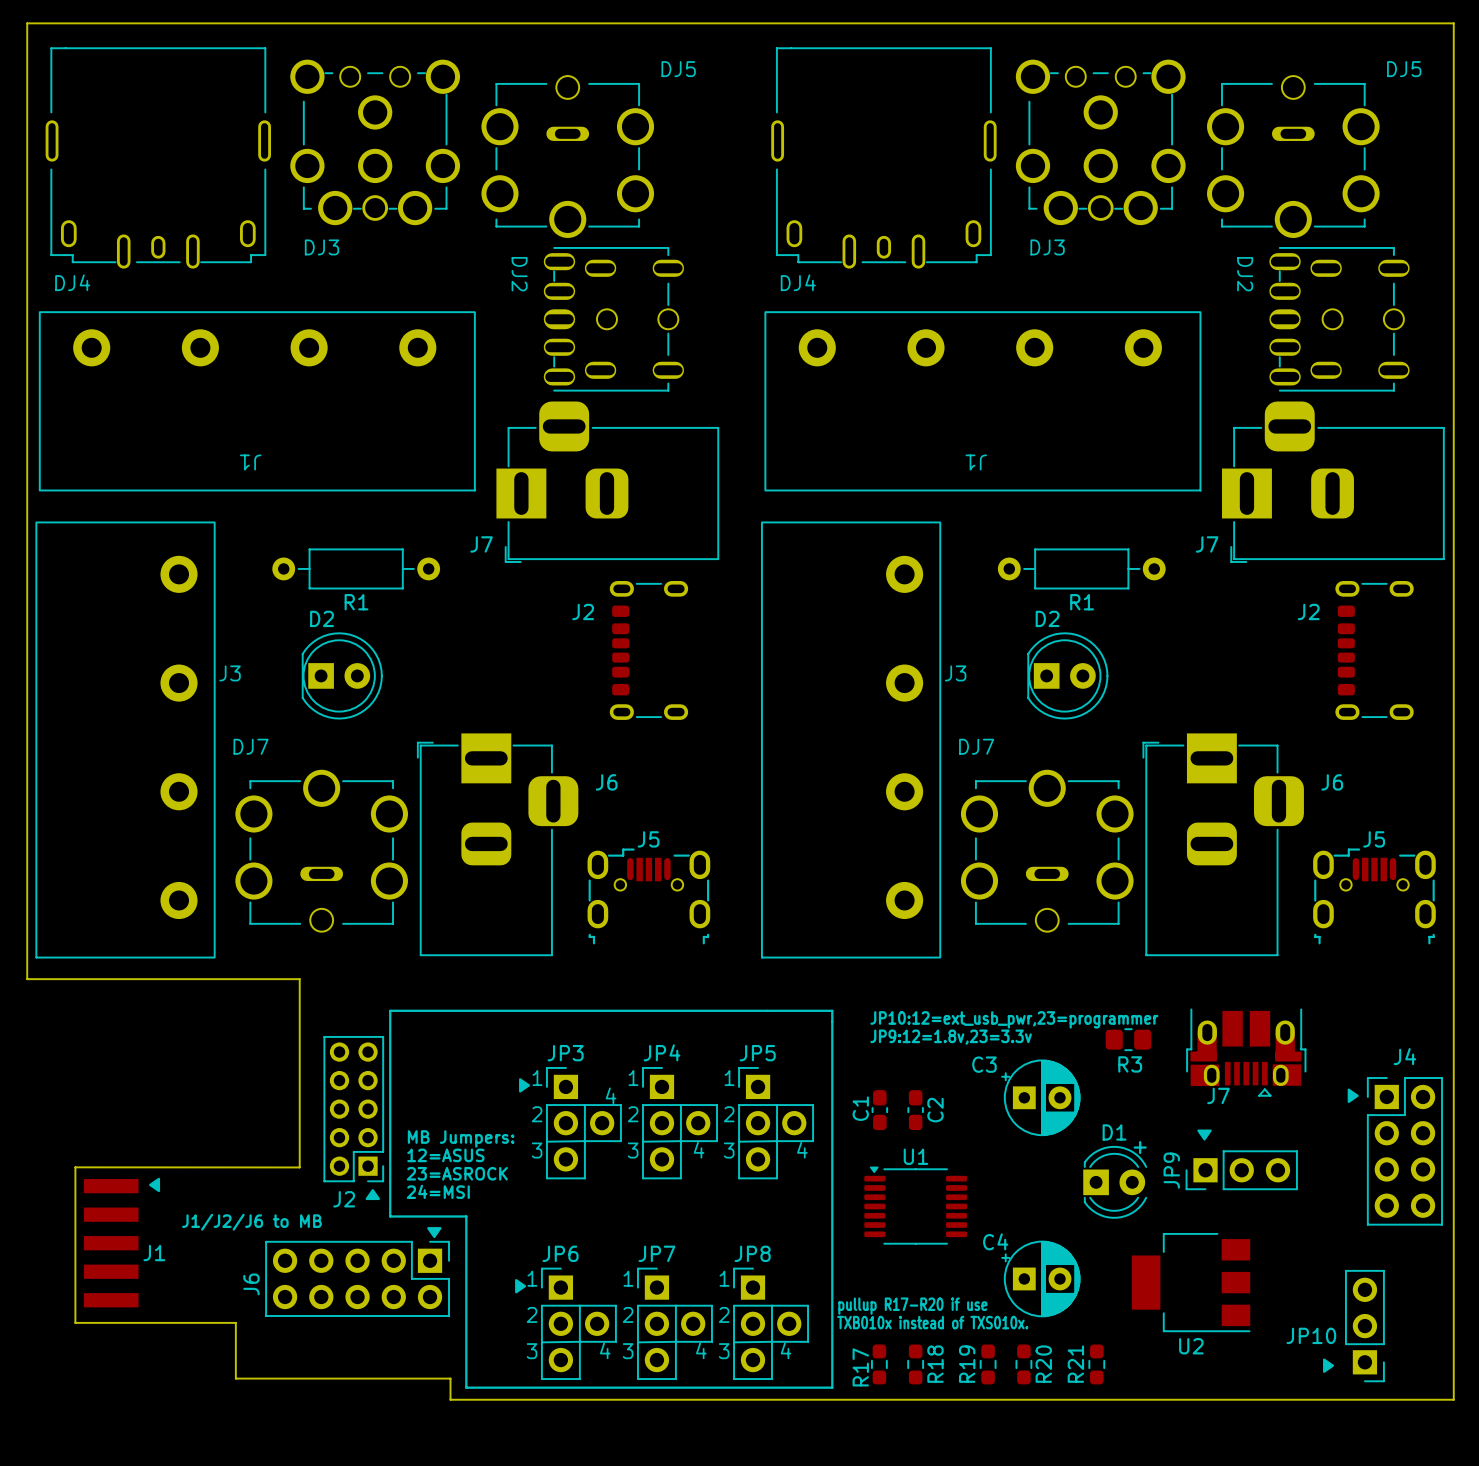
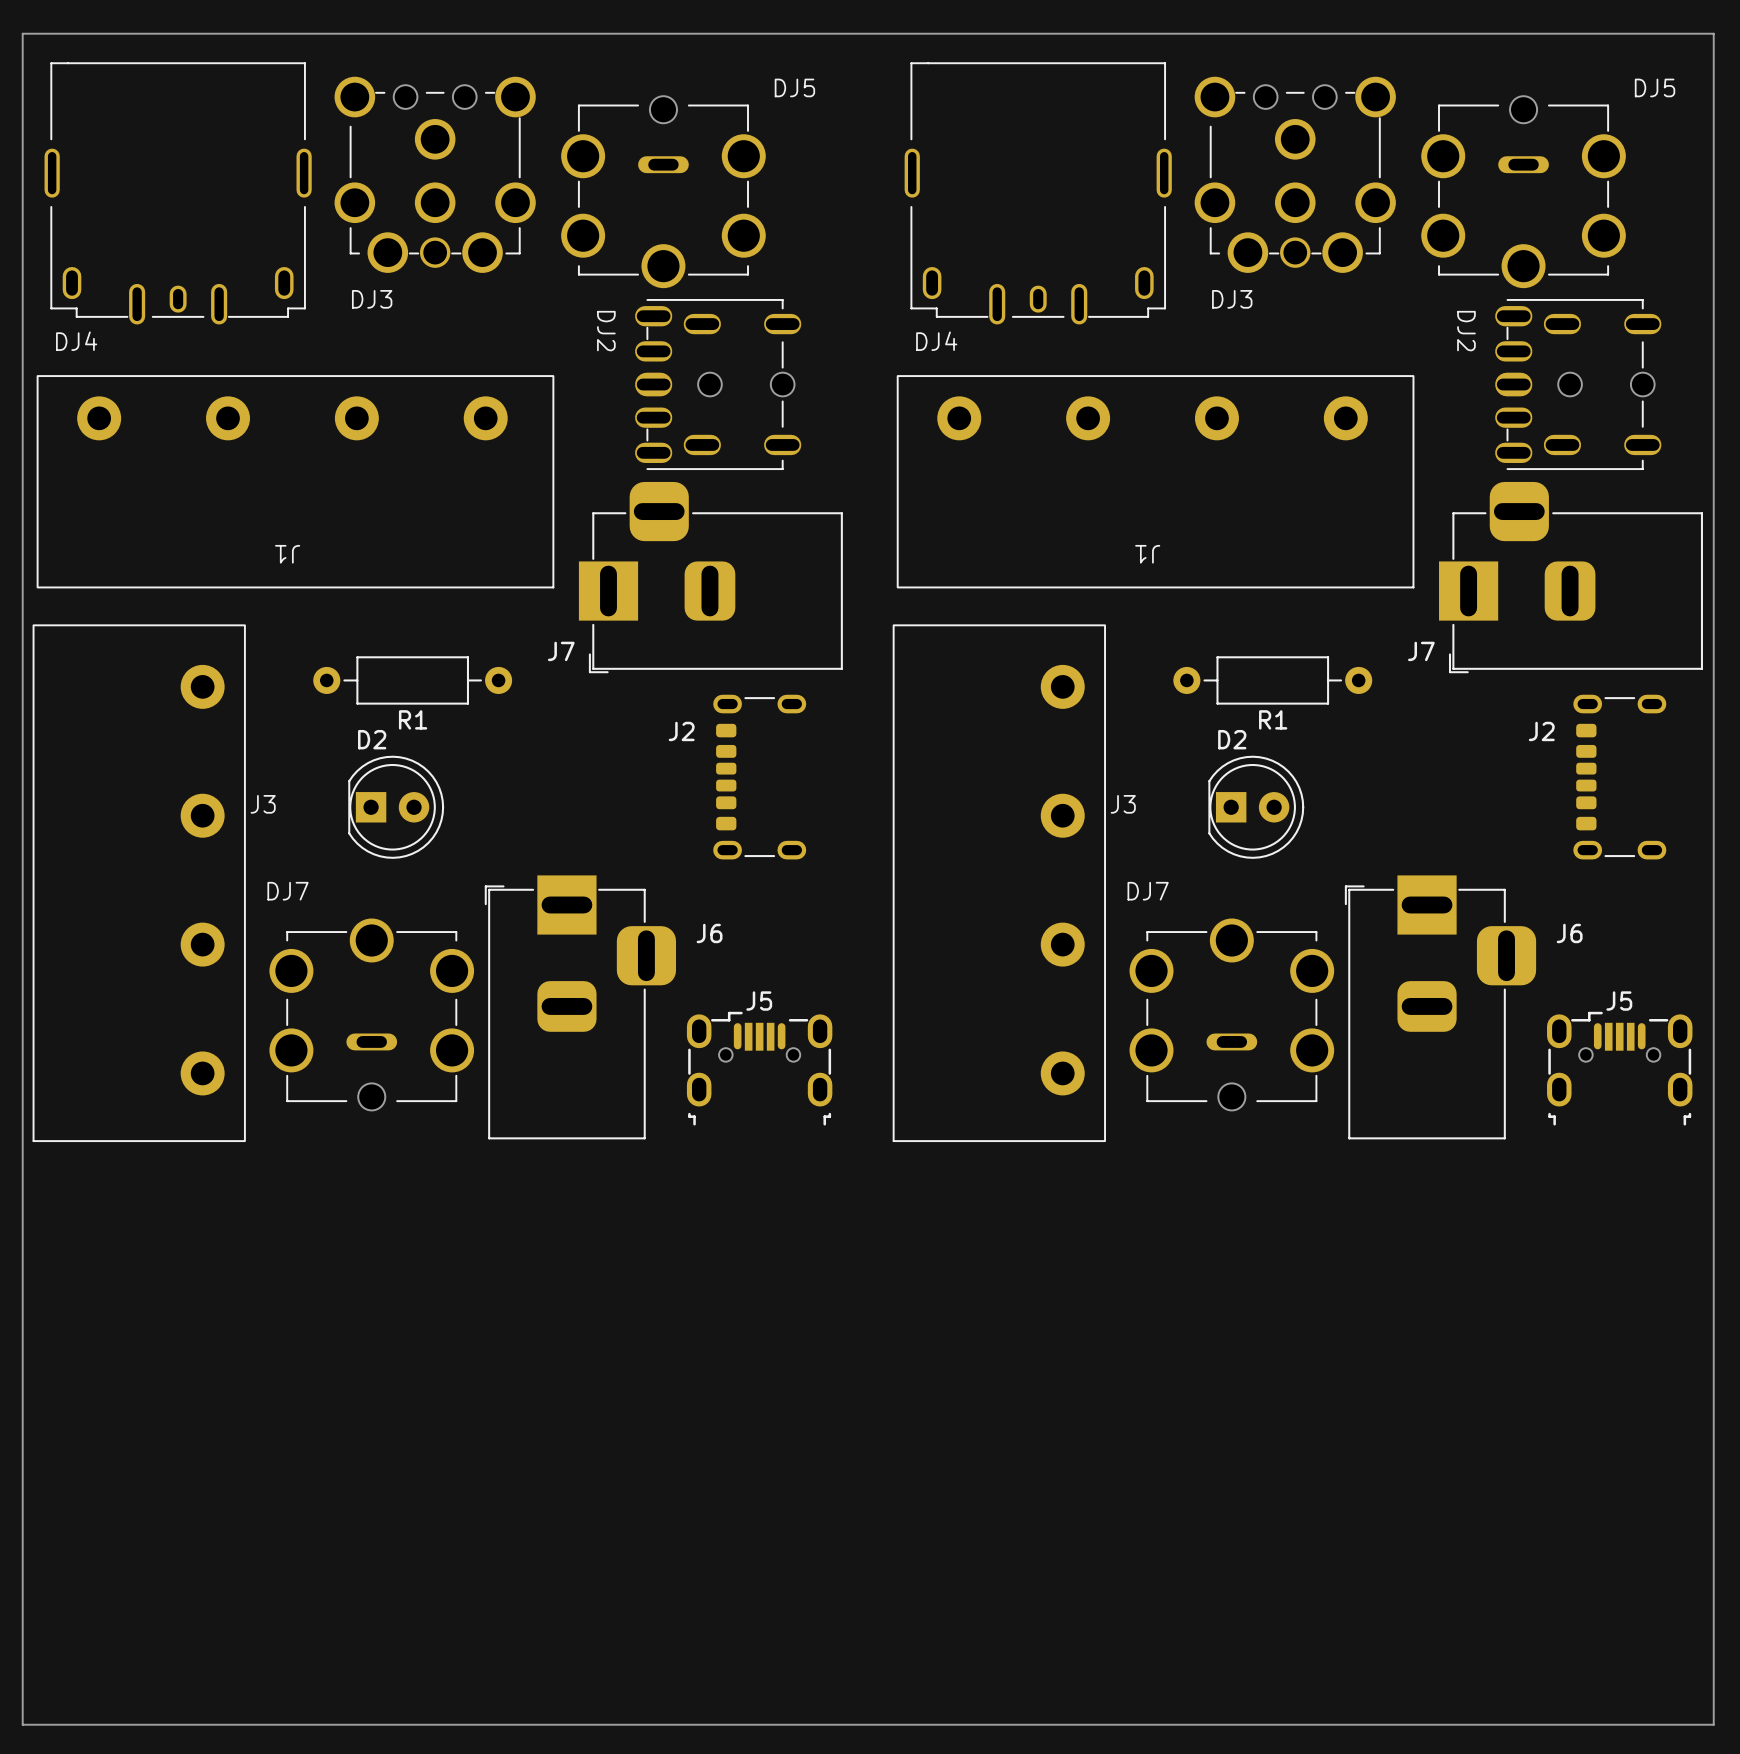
board edge: (27, 979) (299, 979) (299, 1167) (75, 1167) (75, 1322) (235, 1322) (235, 1378) (450, 1378) (450, 1399) (1453, 1399) -> (22, 1166) (22, 1724) (1713, 1724) (1713, 1665)
line: (390, 1010) (832, 1010) (832, 1387) (466, 1387) (466, 1216) (390, 1216) (390, 1010) -> none
text: JP10:12=ext_usb_pwr,23=programmer (1014, 1019) -> none
text: JP9:12=1.8v,23=3.3v (951, 1037) -> none
R3: (1128, 1039) -> none
J7: (1246, 1052) -> none
drawing: [519, 1078, 531, 1093] -> none
drawing: [1347, 1088, 1359, 1103] -> none
C3: (1040, 1097) -> none
J2: (353, 1109) -> none
C1: (879, 1110) -> none
C2: (915, 1110) -> none
JP3: (583, 1123) -> none
JP4: (679, 1123) -> none
JP5: (776, 1123) -> none
drawing: [1197, 1129, 1212, 1141] -> none
text: MB Jumpers: (461, 1138) -> none
text: + (1140, 1147) -> none
J4: (1404, 1151) -> none
text: 12=ASUS (445, 1155) -> none
JP9: (1241, 1170) -> none
text: 23=ASROCK (457, 1173) -> none
drawing: [149, 1177, 161, 1193] -> none
D1: (1115, 1182) -> none
drawing: [365, 1189, 380, 1201] -> none
text: 24=MSI (438, 1191) -> none
U1: (915, 1205) -> none
text: J1/J2/J6 to MB (251, 1222) -> none
drawing: [427, 1227, 442, 1239] -> none
J1: (111, 1243) -> none
J6: (357, 1278) -> none
C4: (1040, 1278) -> none
drawing: [515, 1279, 527, 1294] -> none
U2: (1191, 1282) -> none
text: pullup R17-R20 if use (912, 1306) -> none
text: TXB010x instead of TXS010x. (932, 1322) -> none
JP6: (578, 1323) -> none
JP7: (674, 1323) -> none
JP8: (770, 1323) -> none
JP10: (1364, 1326) -> none
drawing: [1323, 1358, 1335, 1373] -> none
R17: (879, 1364) -> none
R18: (915, 1364) -> none
R19: (988, 1364) -> none
R20: (1023, 1364) -> none
R21: (1096, 1364) -> none

